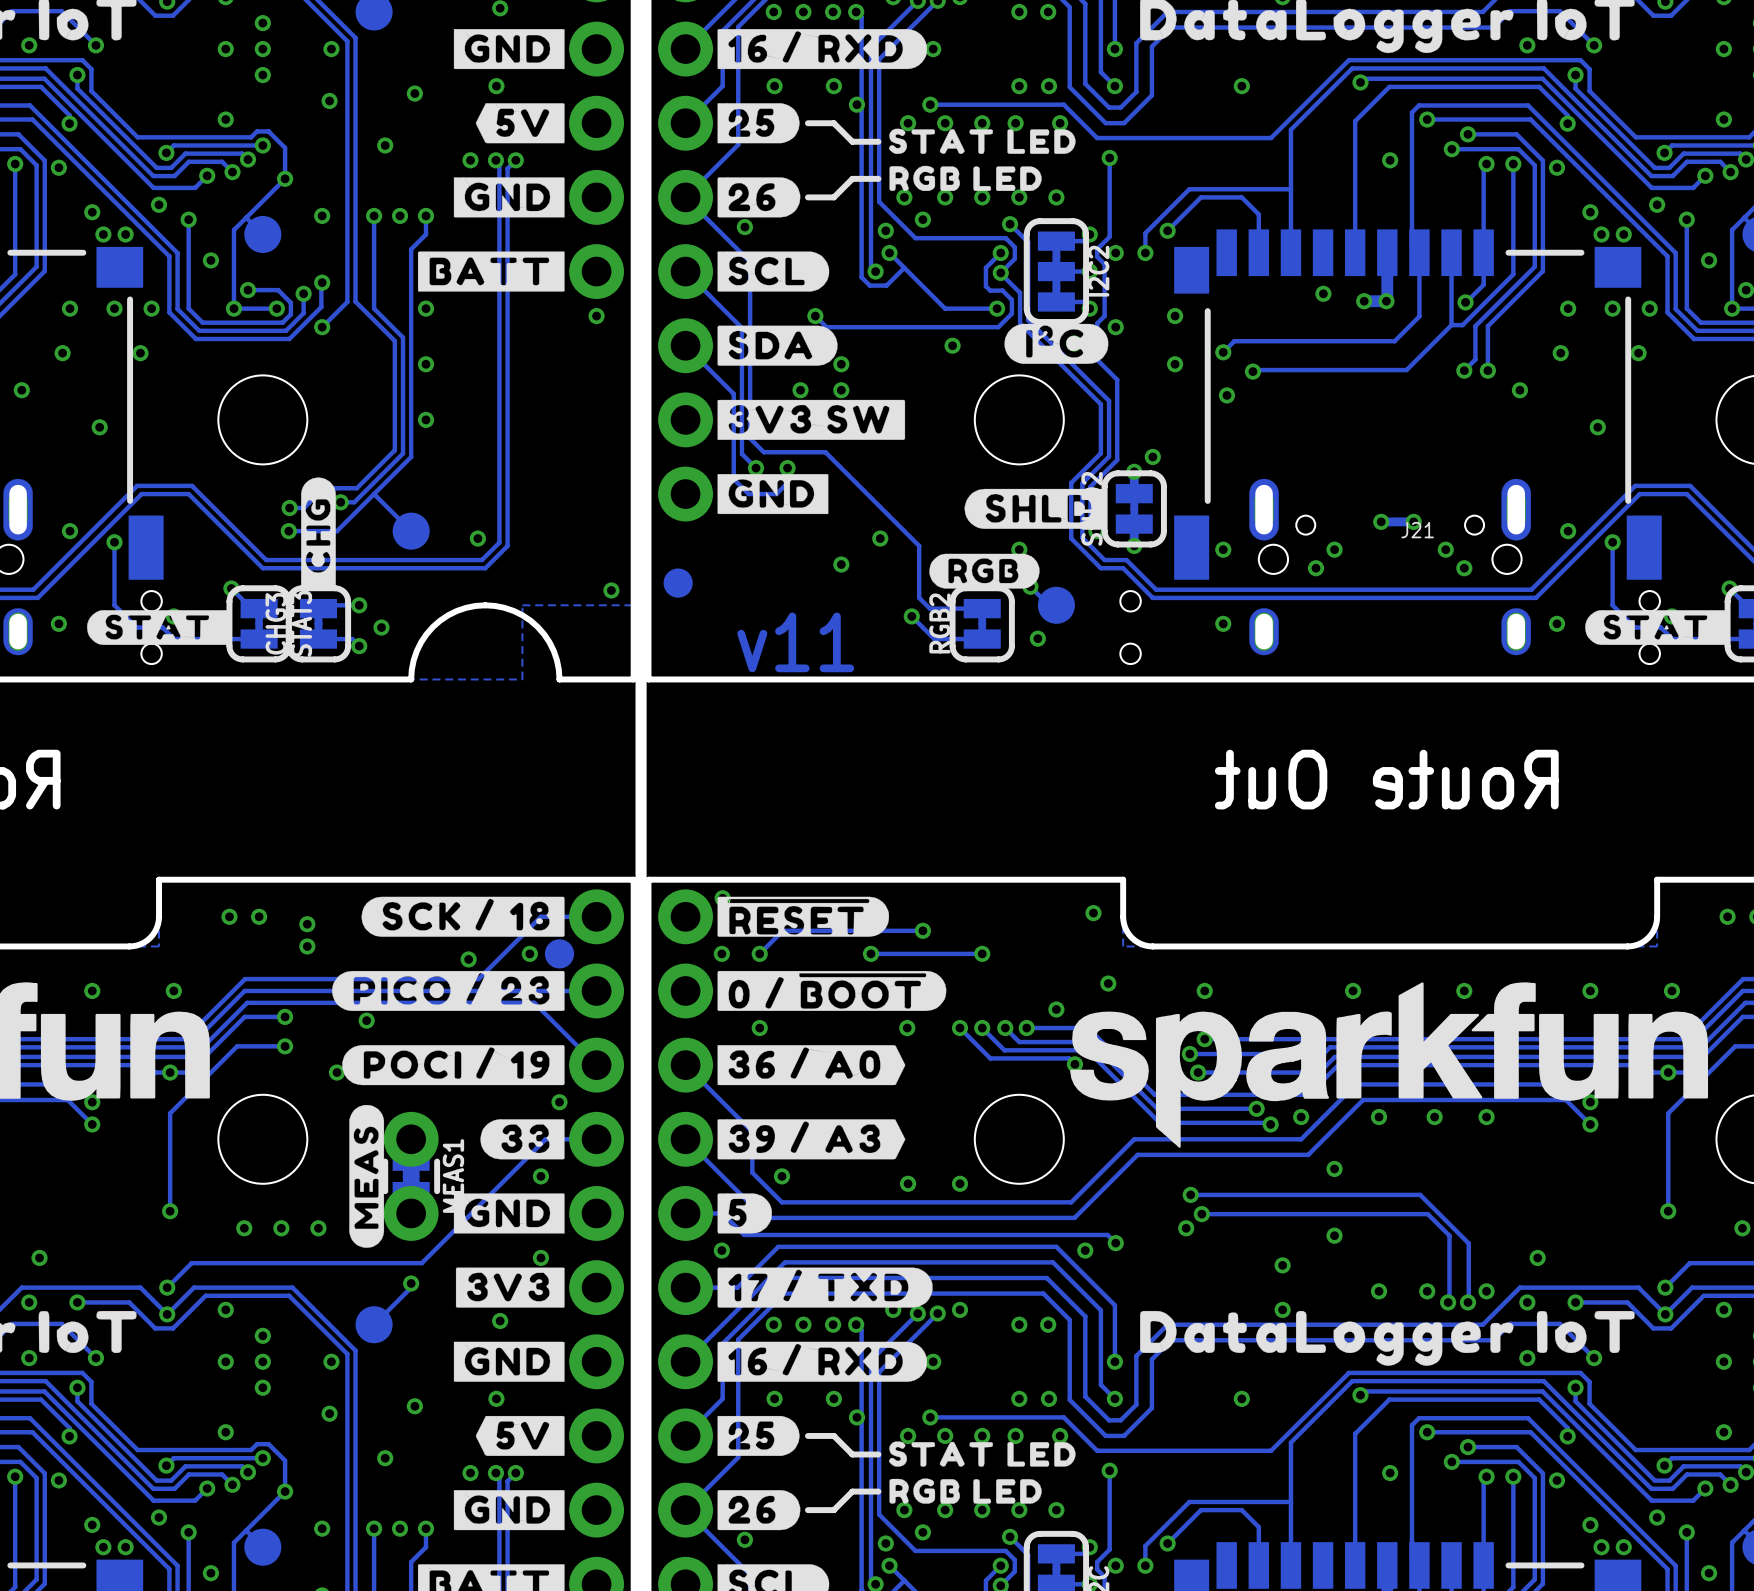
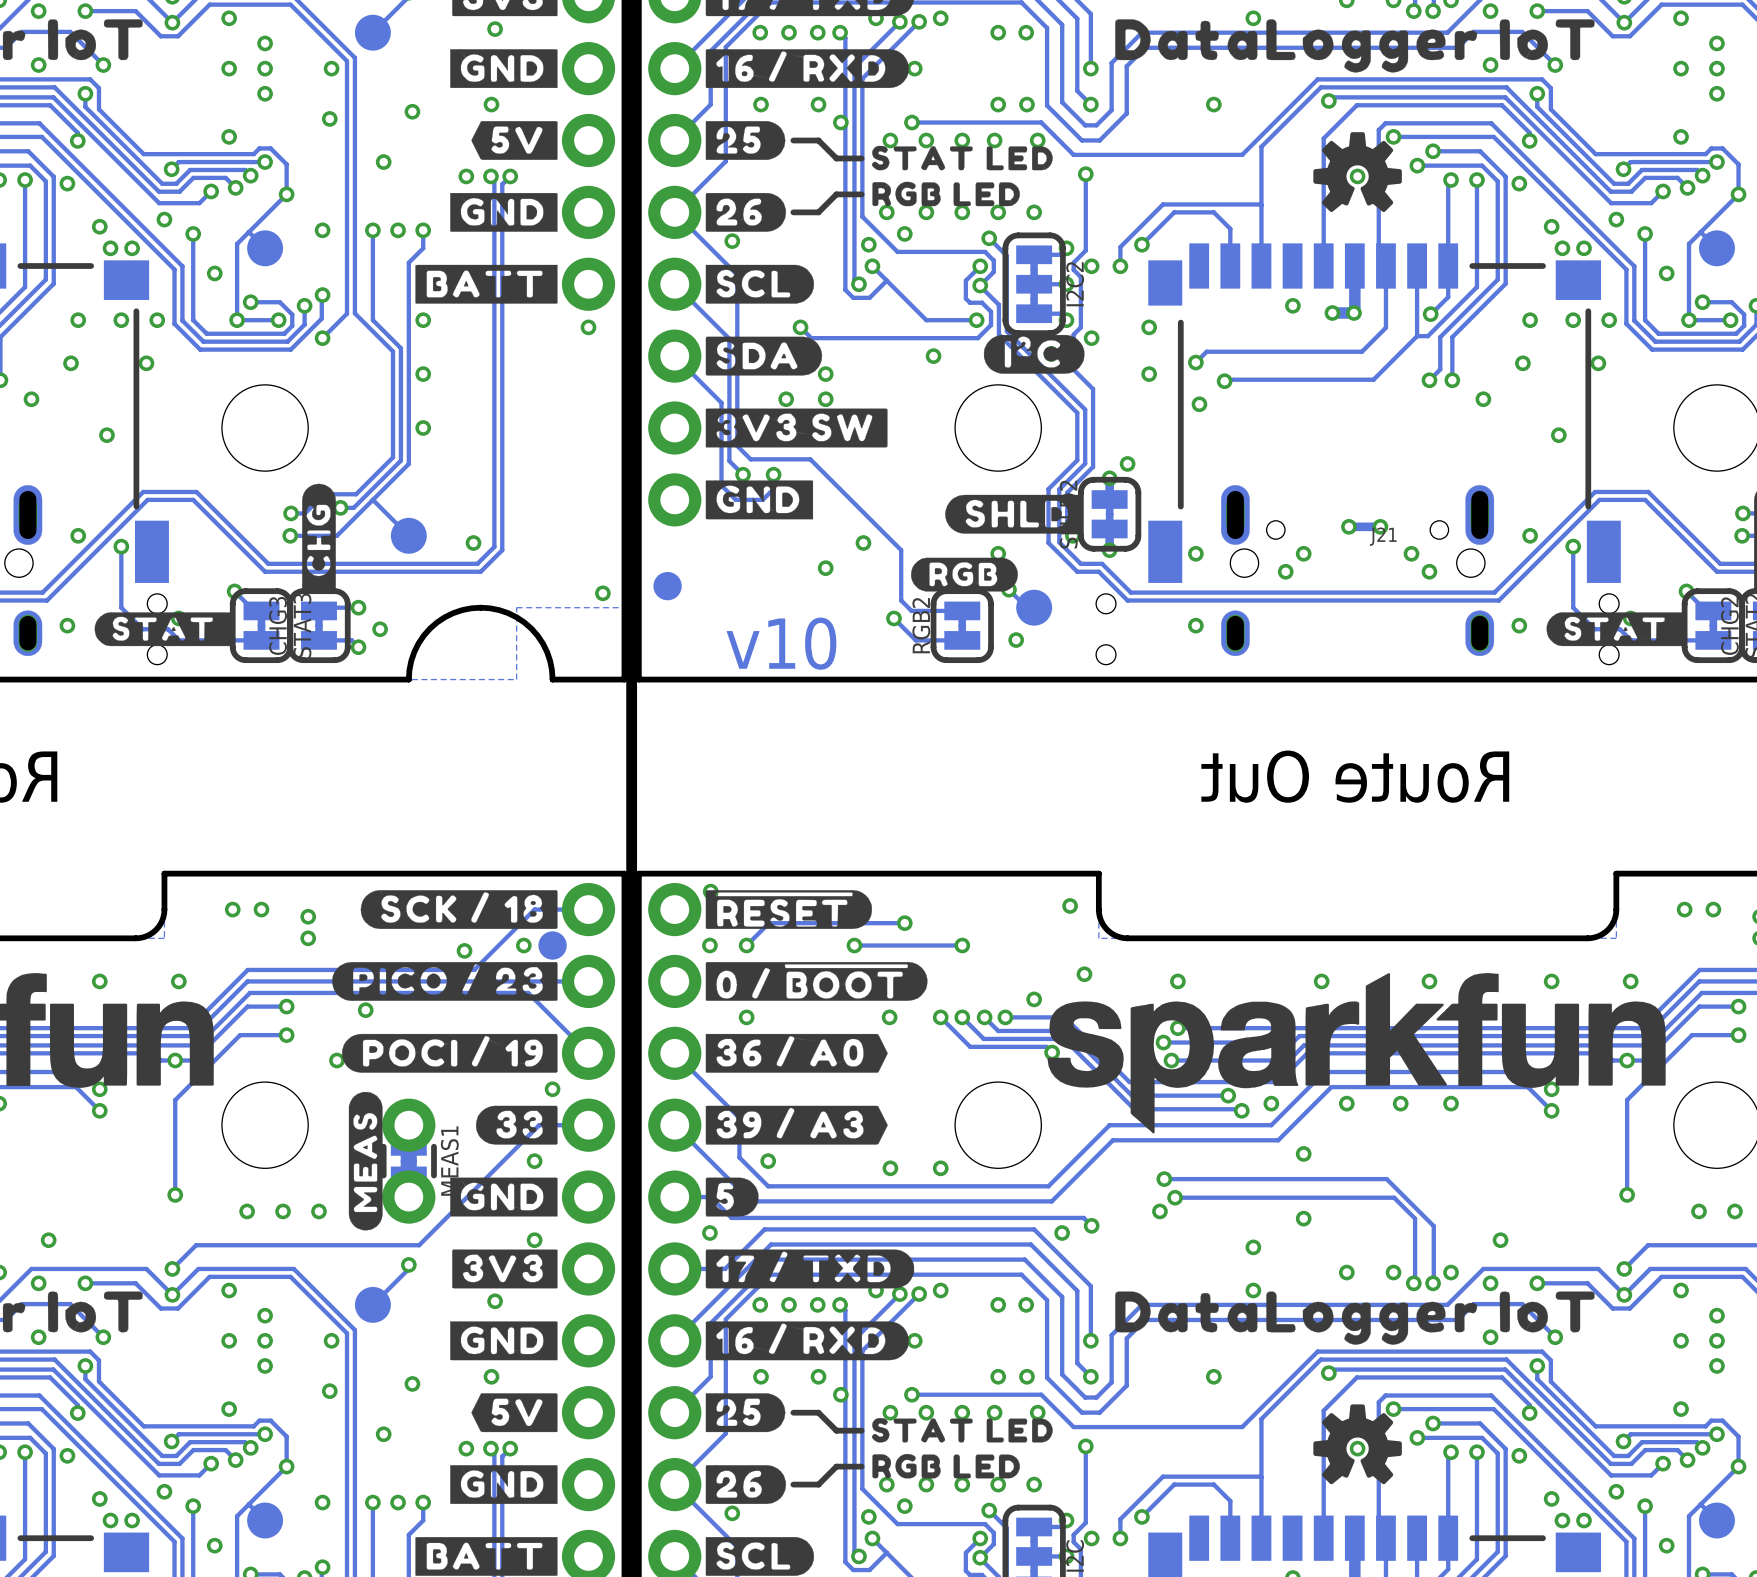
drawing: none -> [1313, 132, 1402, 213]
text: v11 (795, 642) -> v10 (781, 643)
drawing: none -> [1313, 1404, 1402, 1485]

